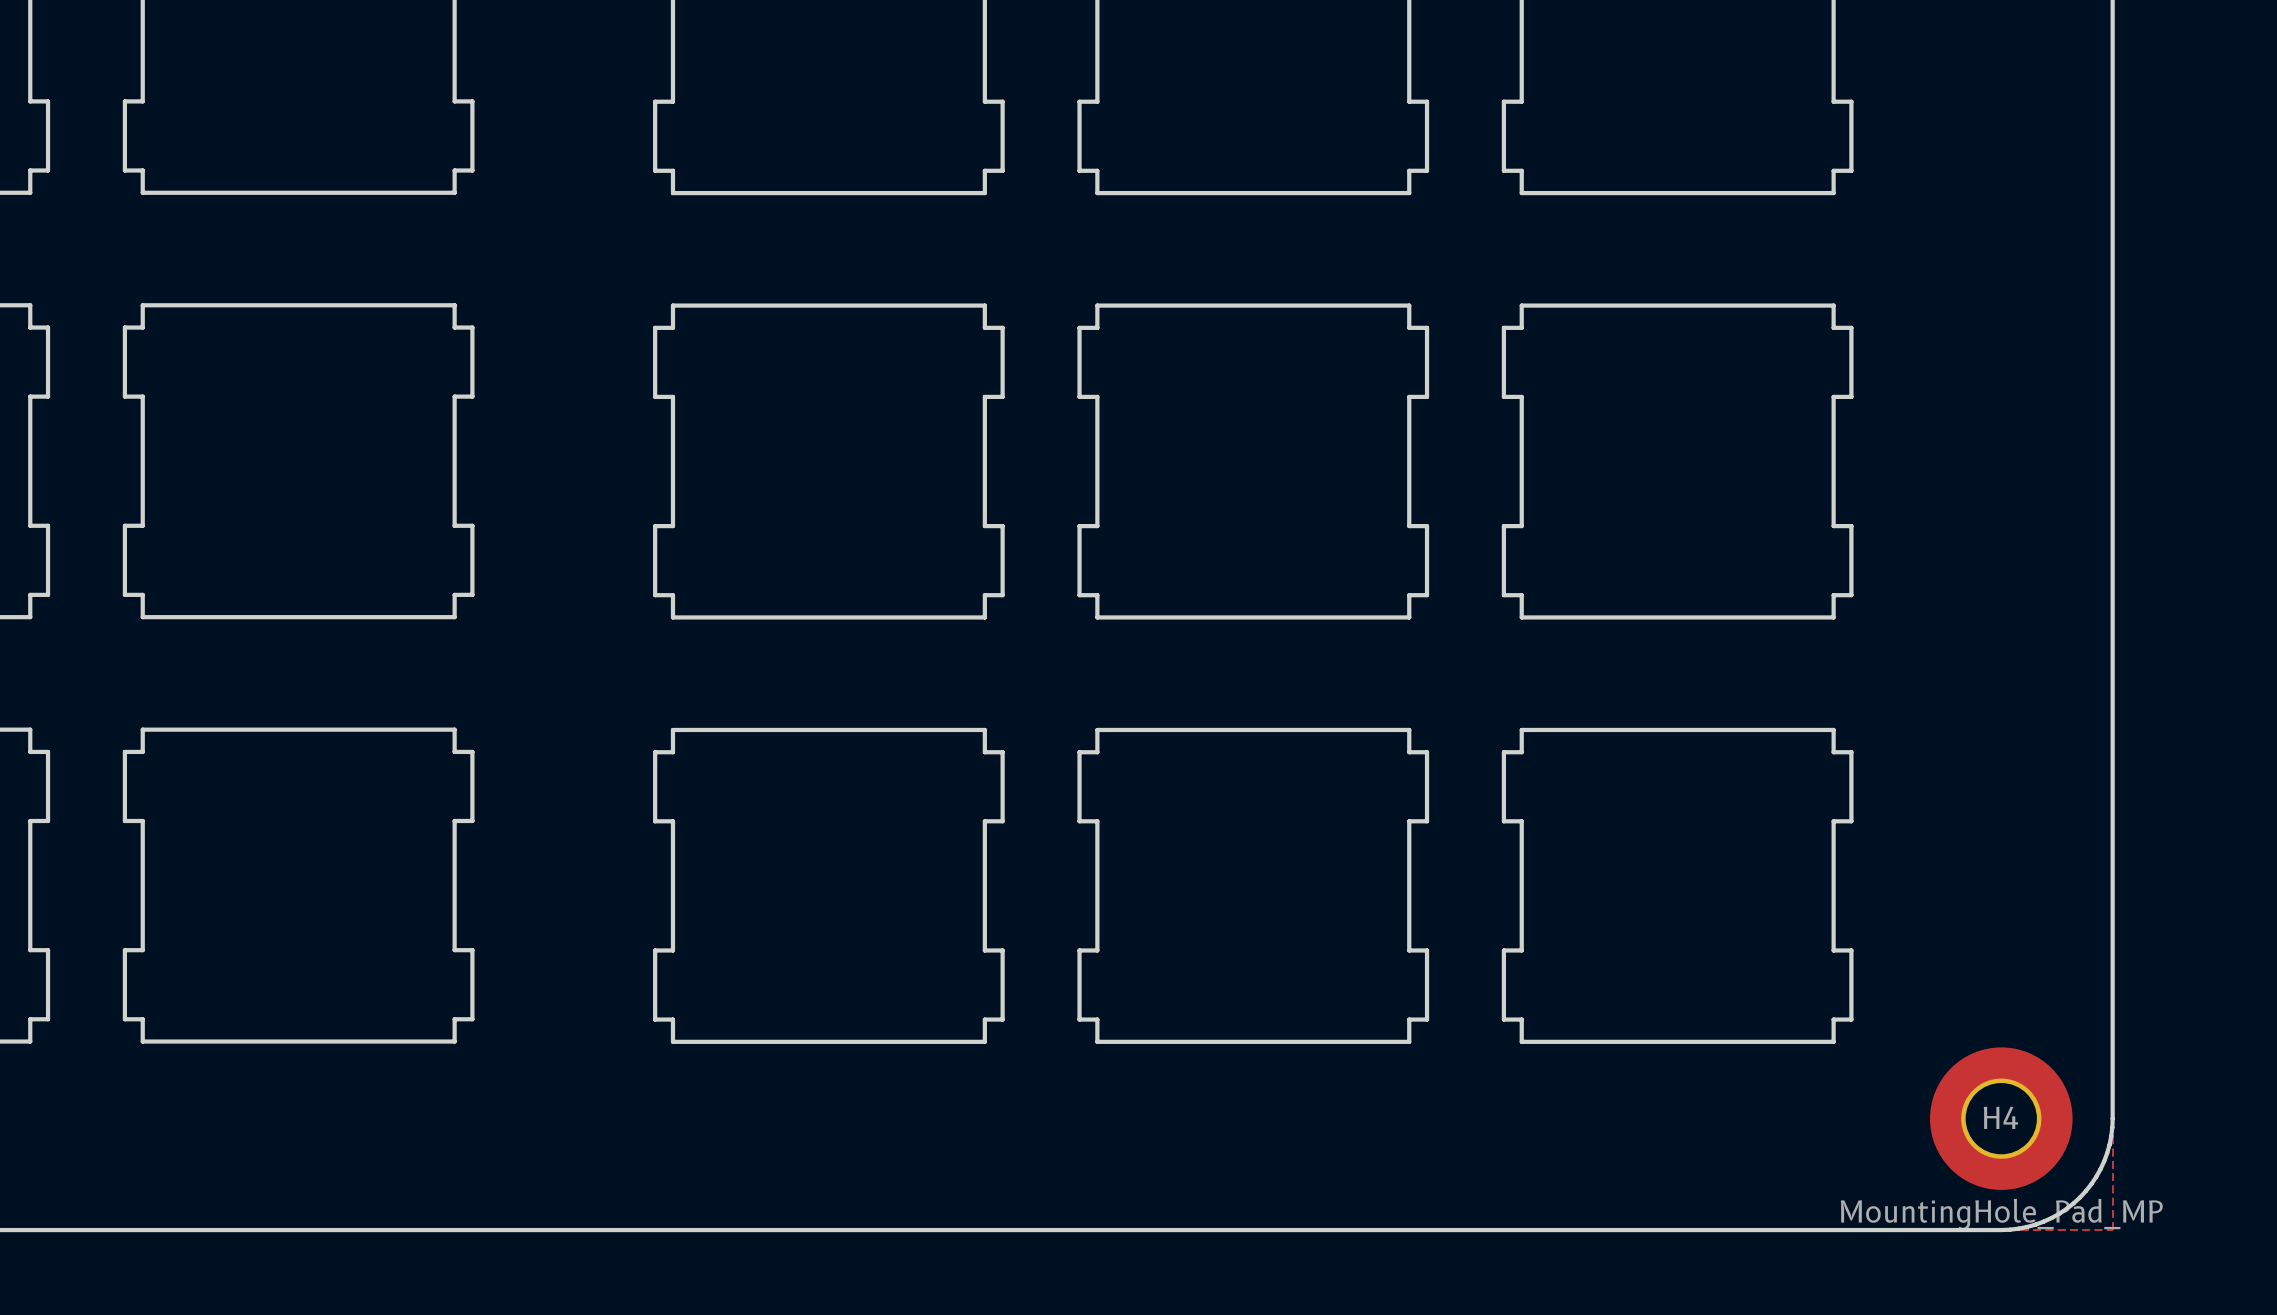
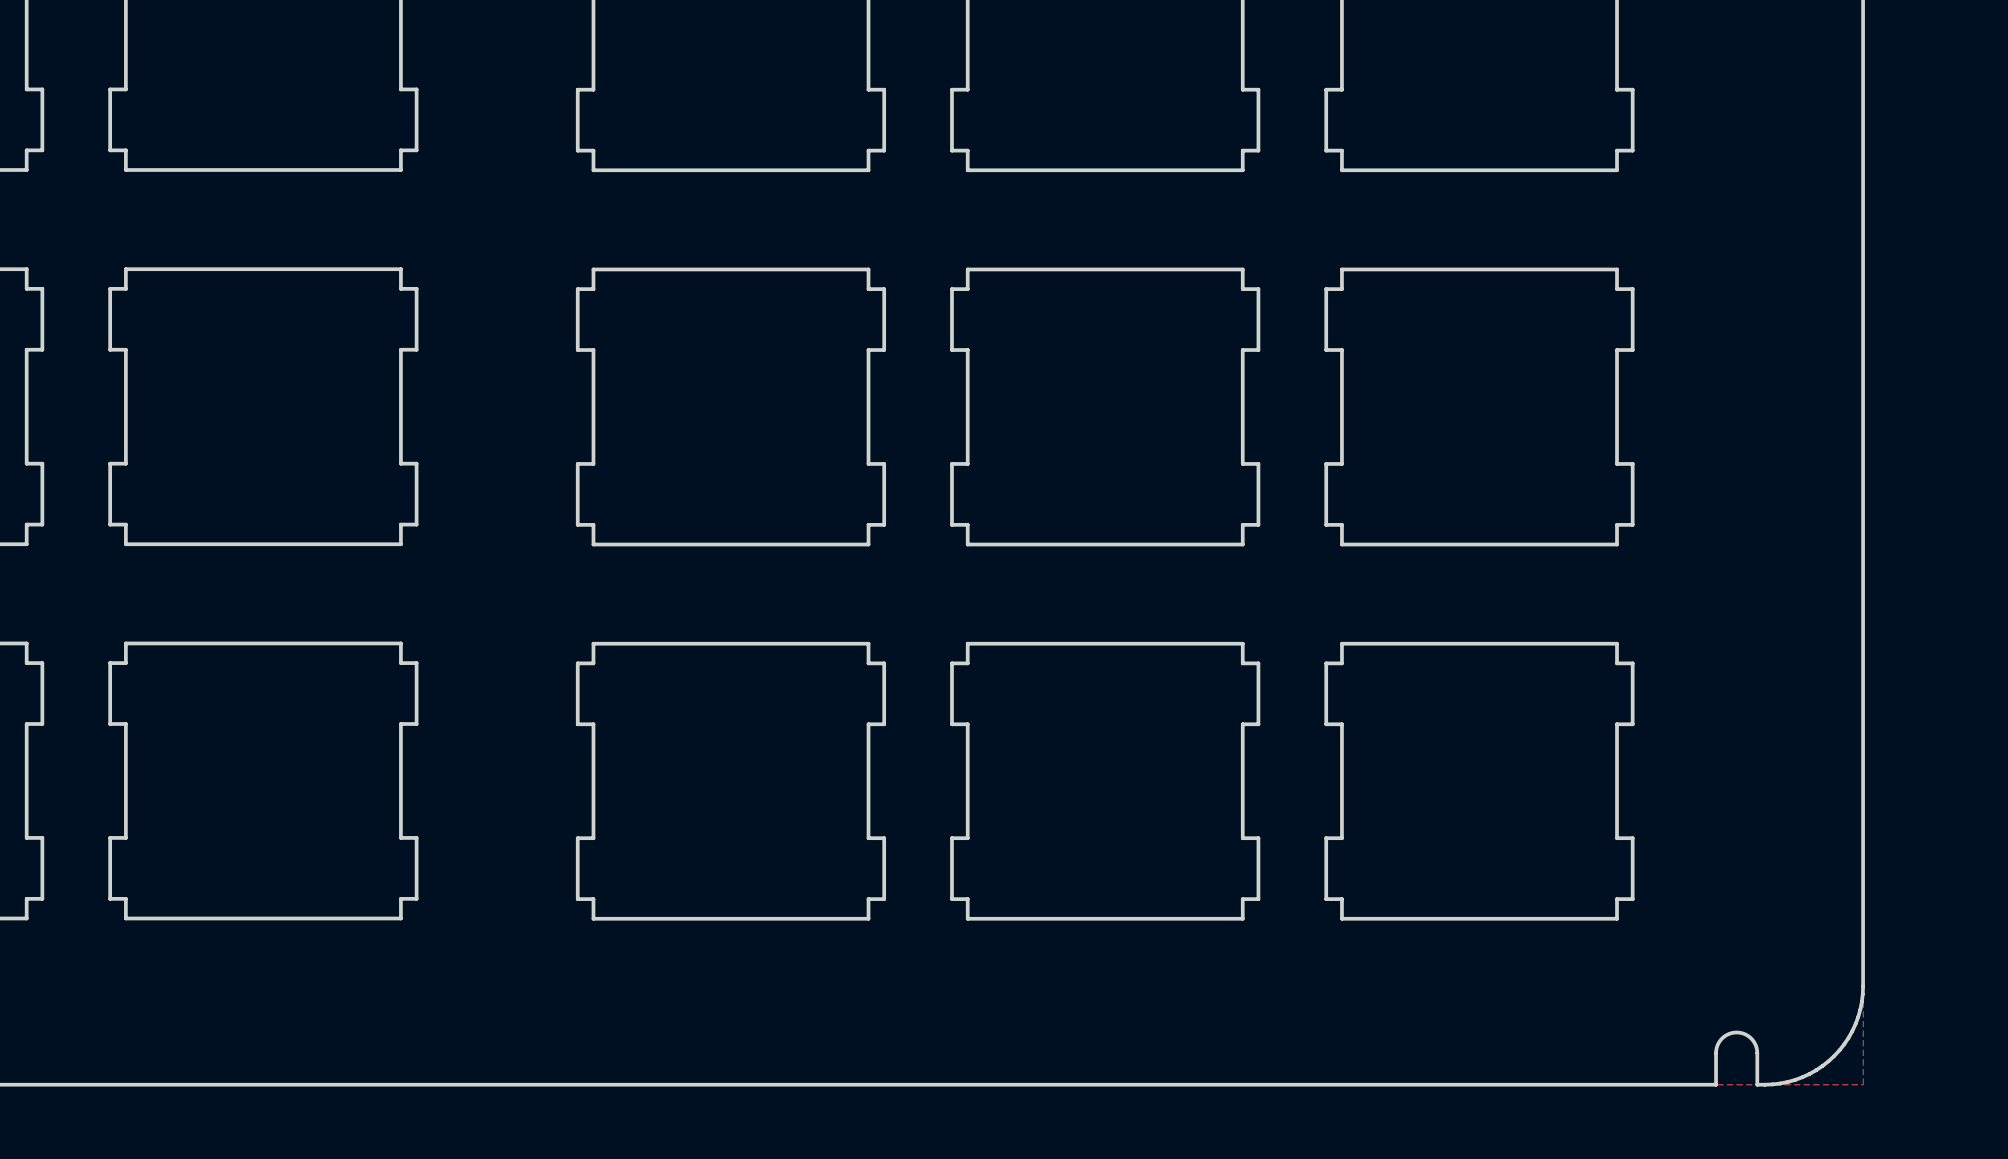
H4: MountingHole_Pad_MP (2001, 1118) -> none
board edge: (1945, 1230) (1992, 1230) -> (1716, 1084) (1717, 1045) (1724, 1036) (1736, 1032) (1748, 1036) (1755, 1045) (1757, 1084)

